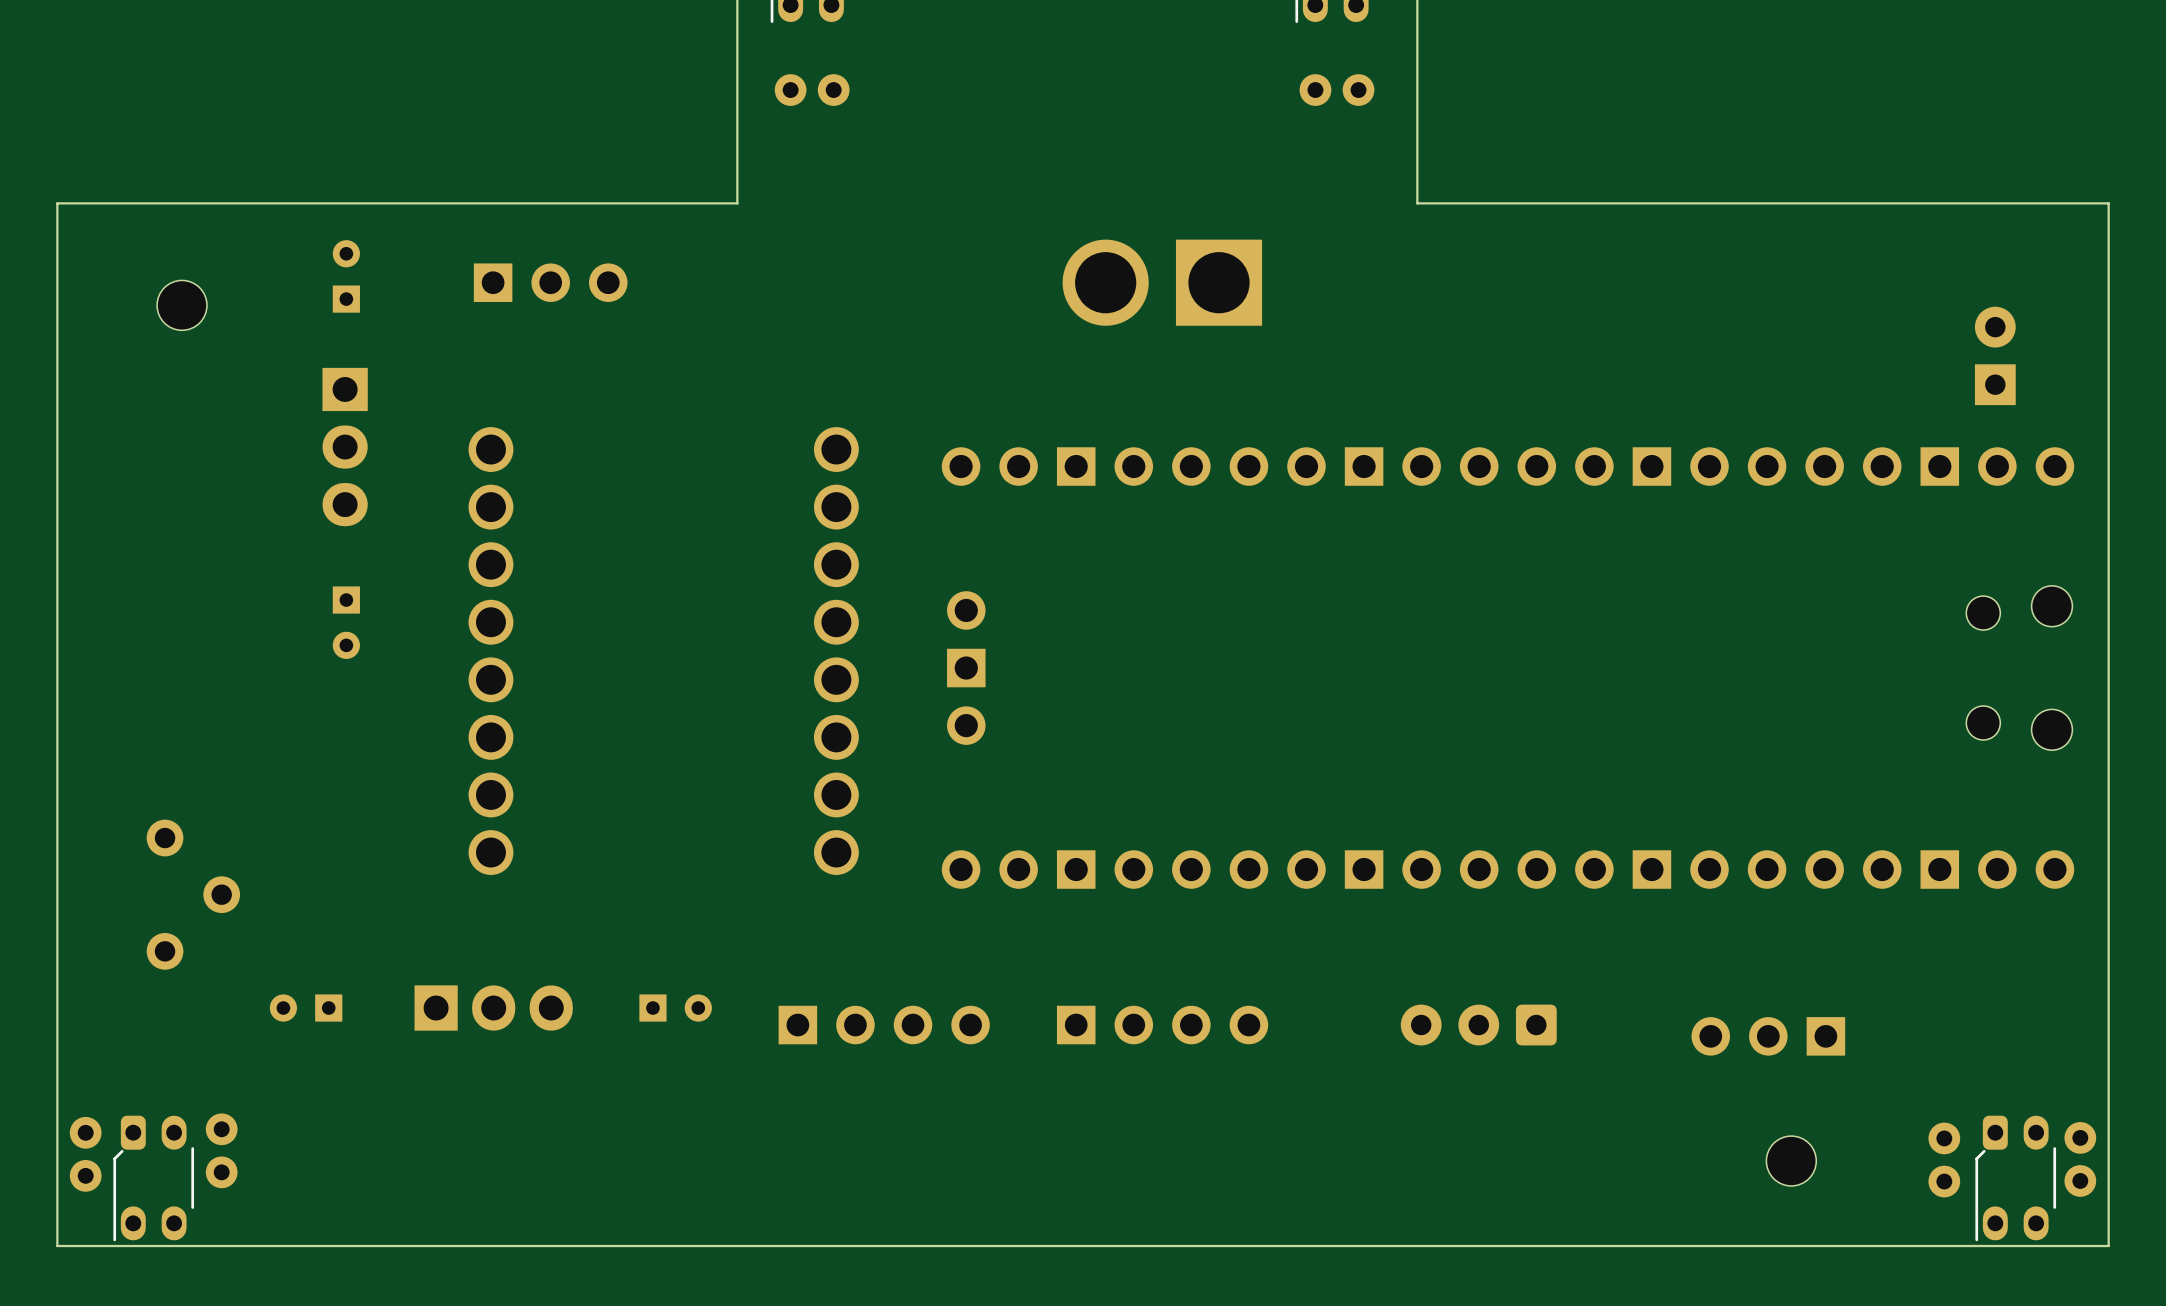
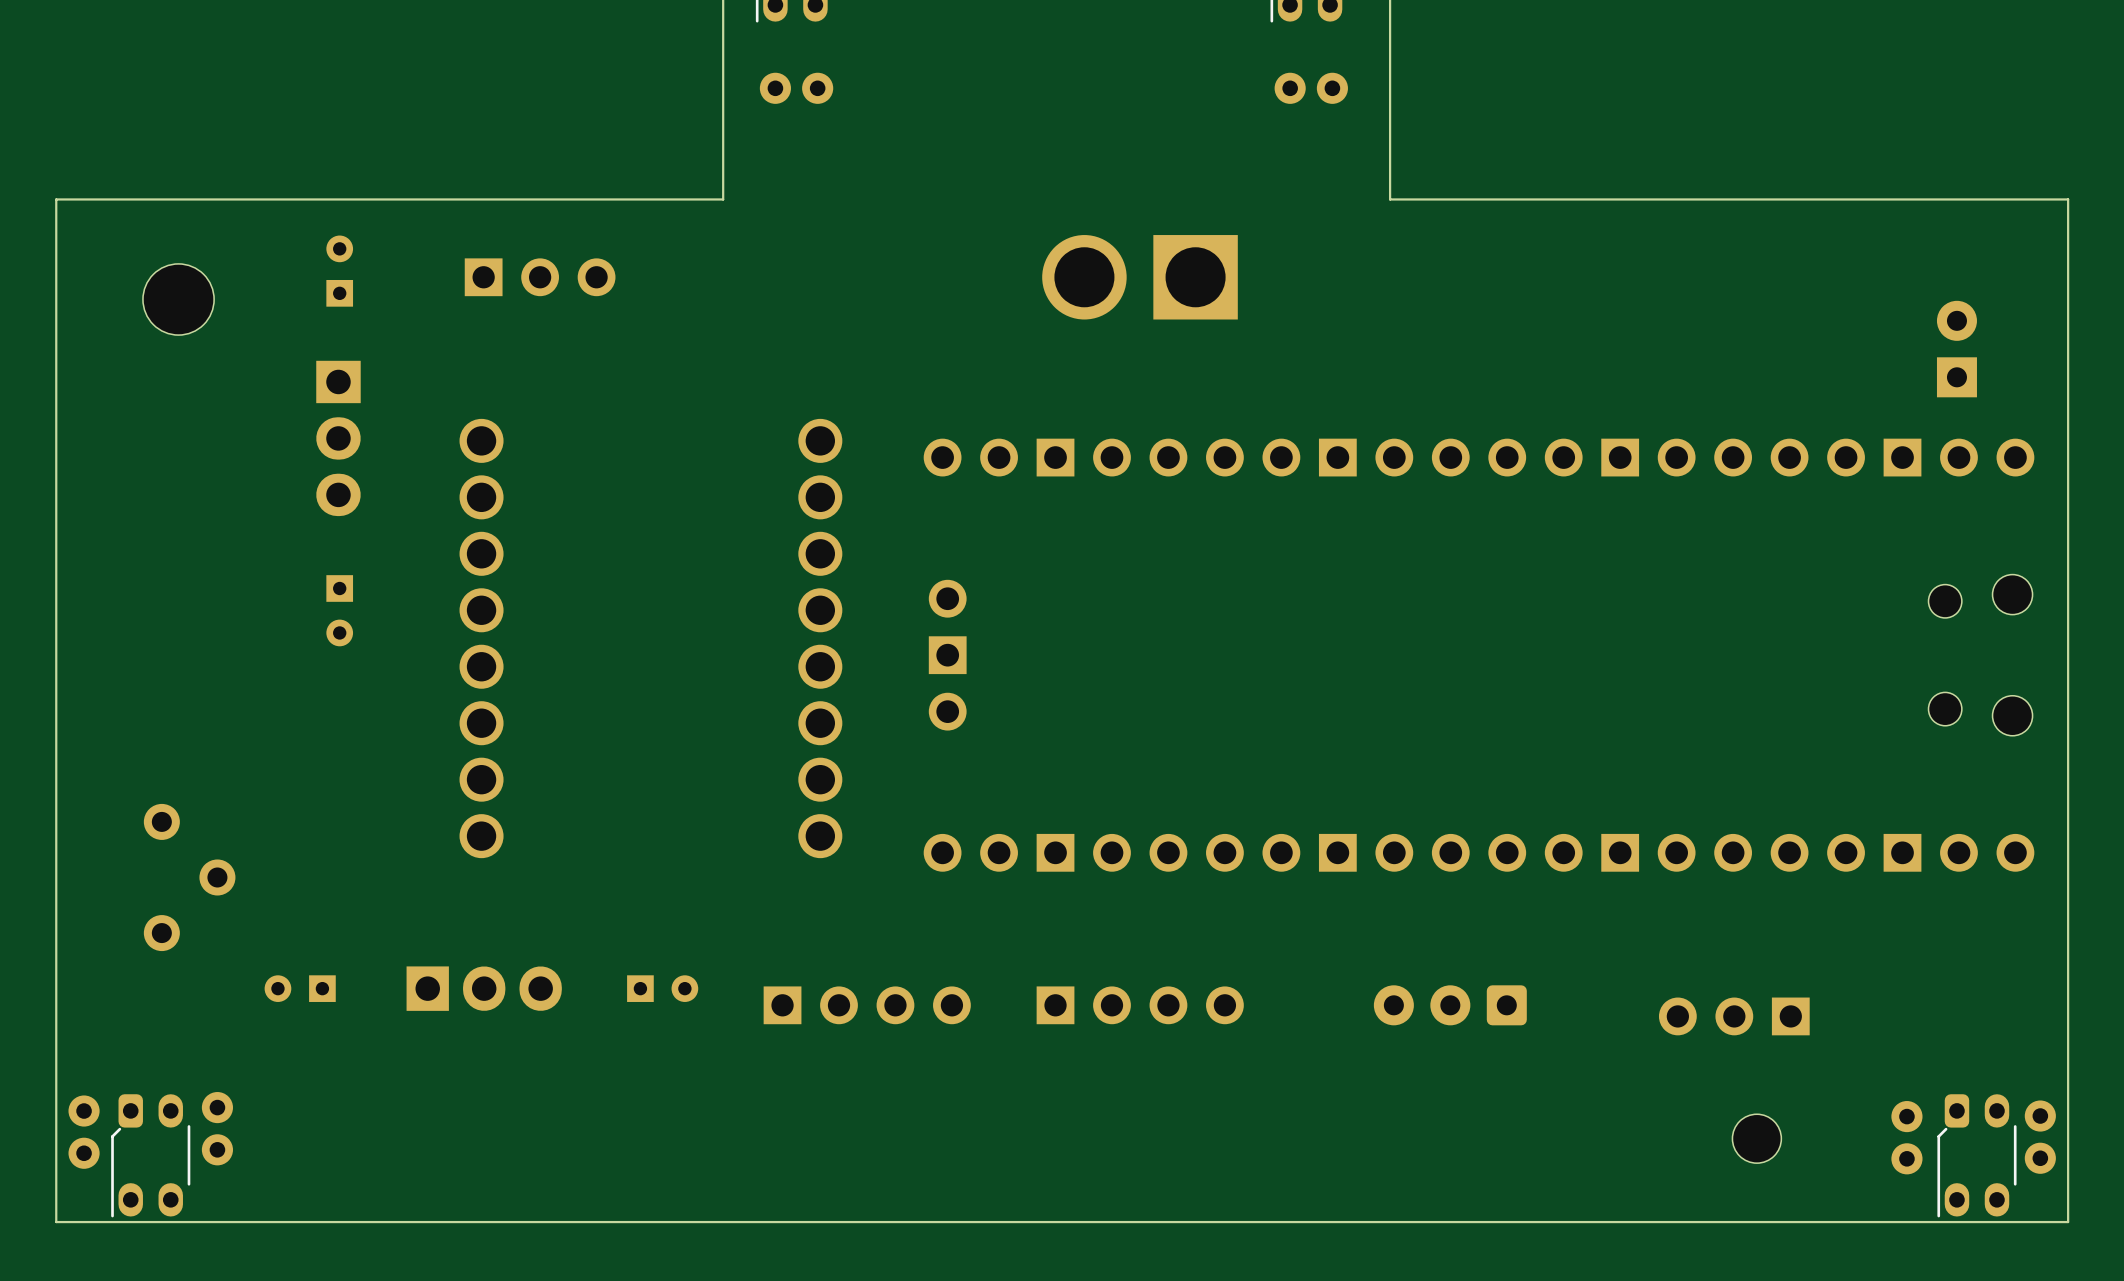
part footprint: [157, 280, 207, 331] -> [142, 263, 215, 336]

